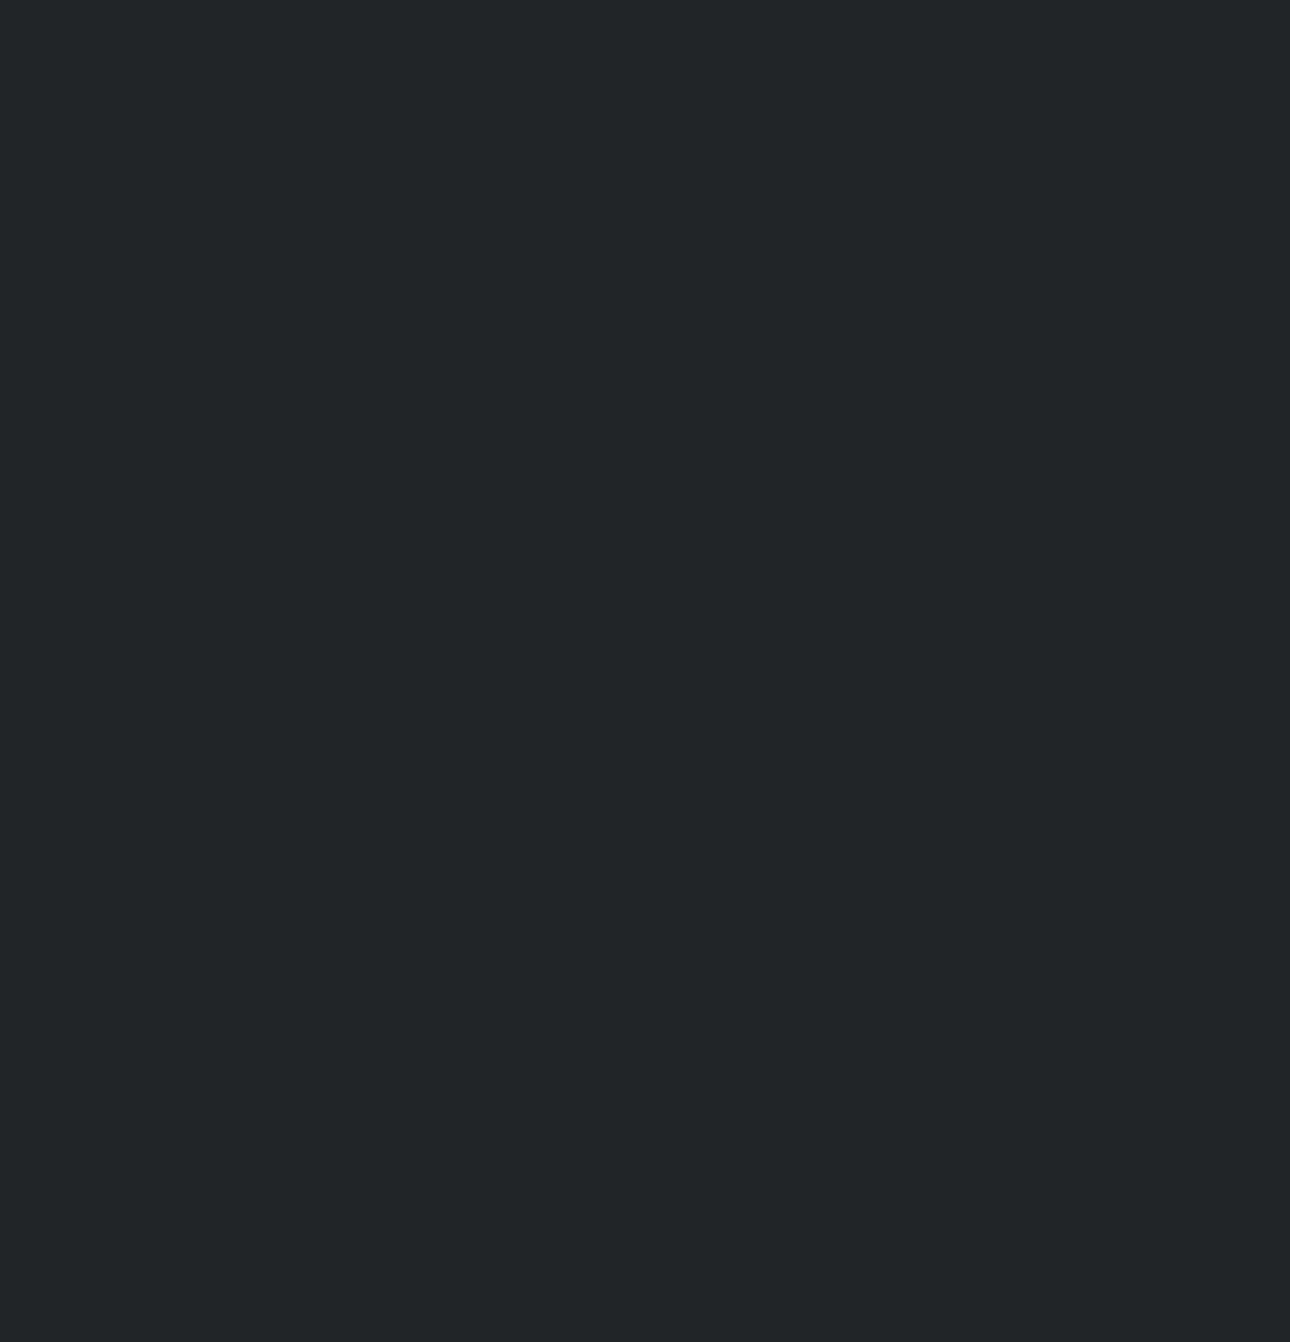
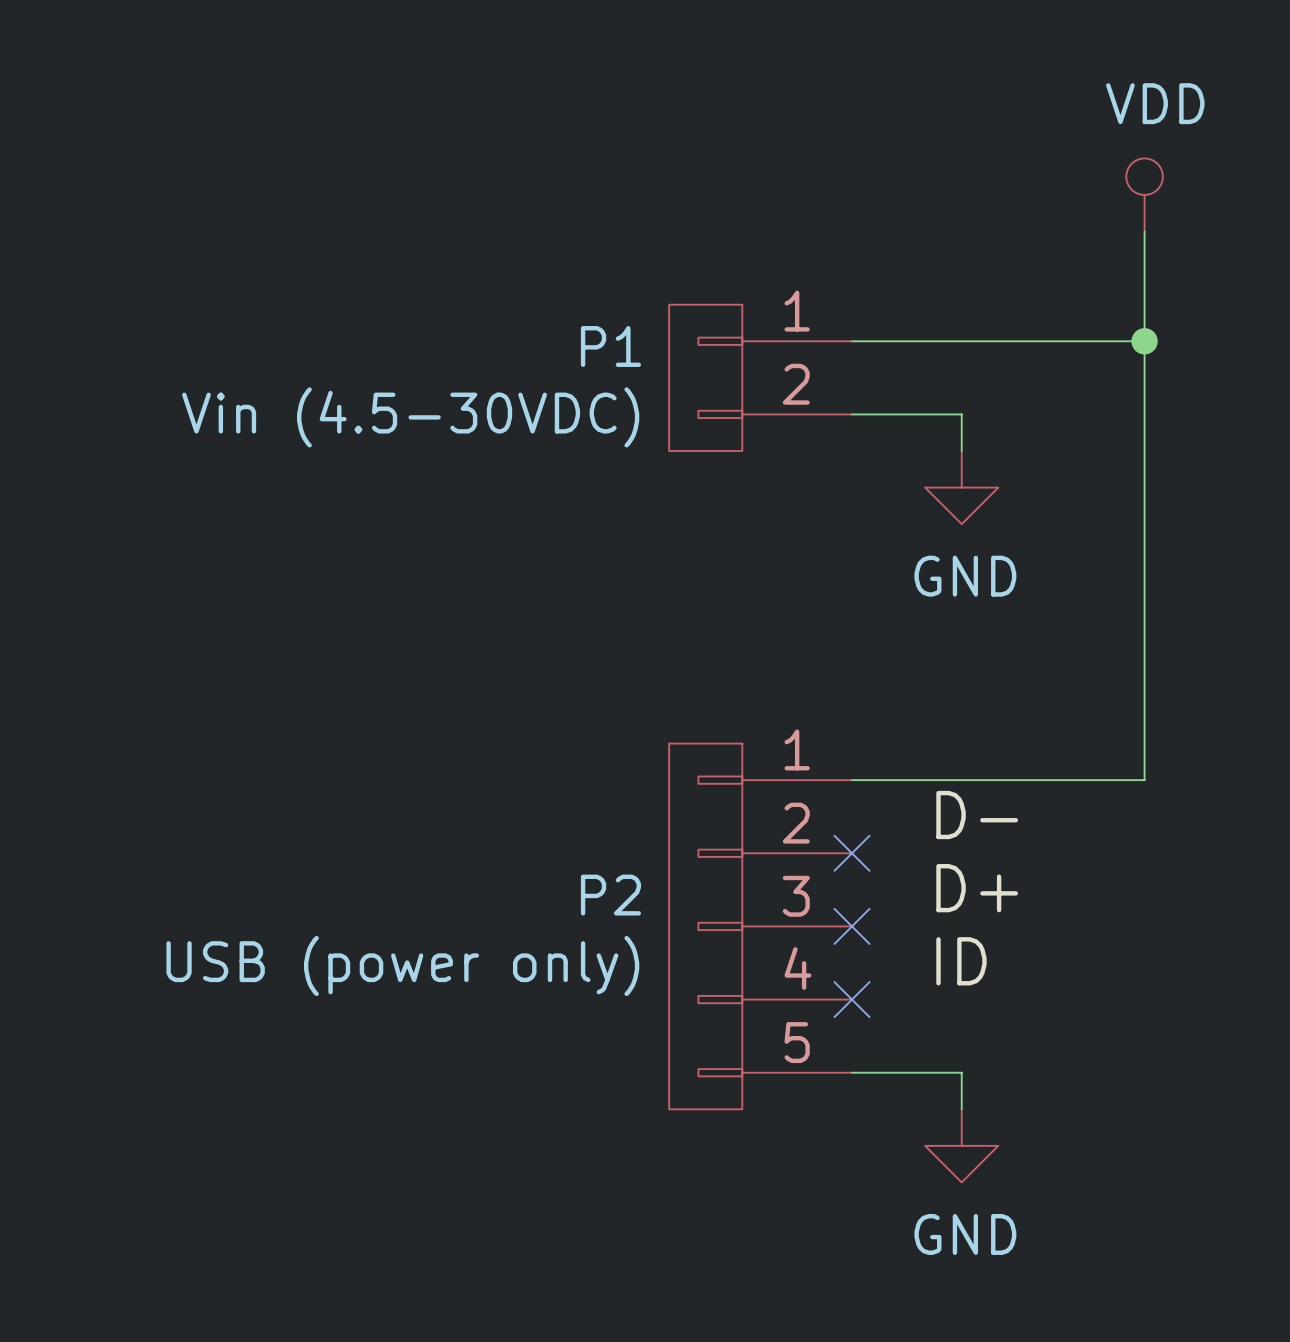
power symbol: none -> VDD (1144, 194)
wire: none -> (1144, 231) (1144, 780) (852, 780)
wire: none -> (852, 341) (1144, 341)
junction: none -> (1144, 341)
P1: none -> Vin (4.5-30VDC) (760, 377)
wire: none -> (852, 414) (961, 414) (961, 450)
power symbol: none -> GND (961, 487)
label: none -> D- (977, 815)
no-connect mark: none -> (852, 853)
label: none -> D+ (977, 888)
P2: none -> USB (power only) (760, 926)
no-connect mark: none -> (852, 926)
label: none -> ID (961, 961)
no-connect mark: none -> (852, 999)
wire: none -> (852, 1072) (961, 1072) (961, 1109)
power symbol: none -> GND (961, 1145)

